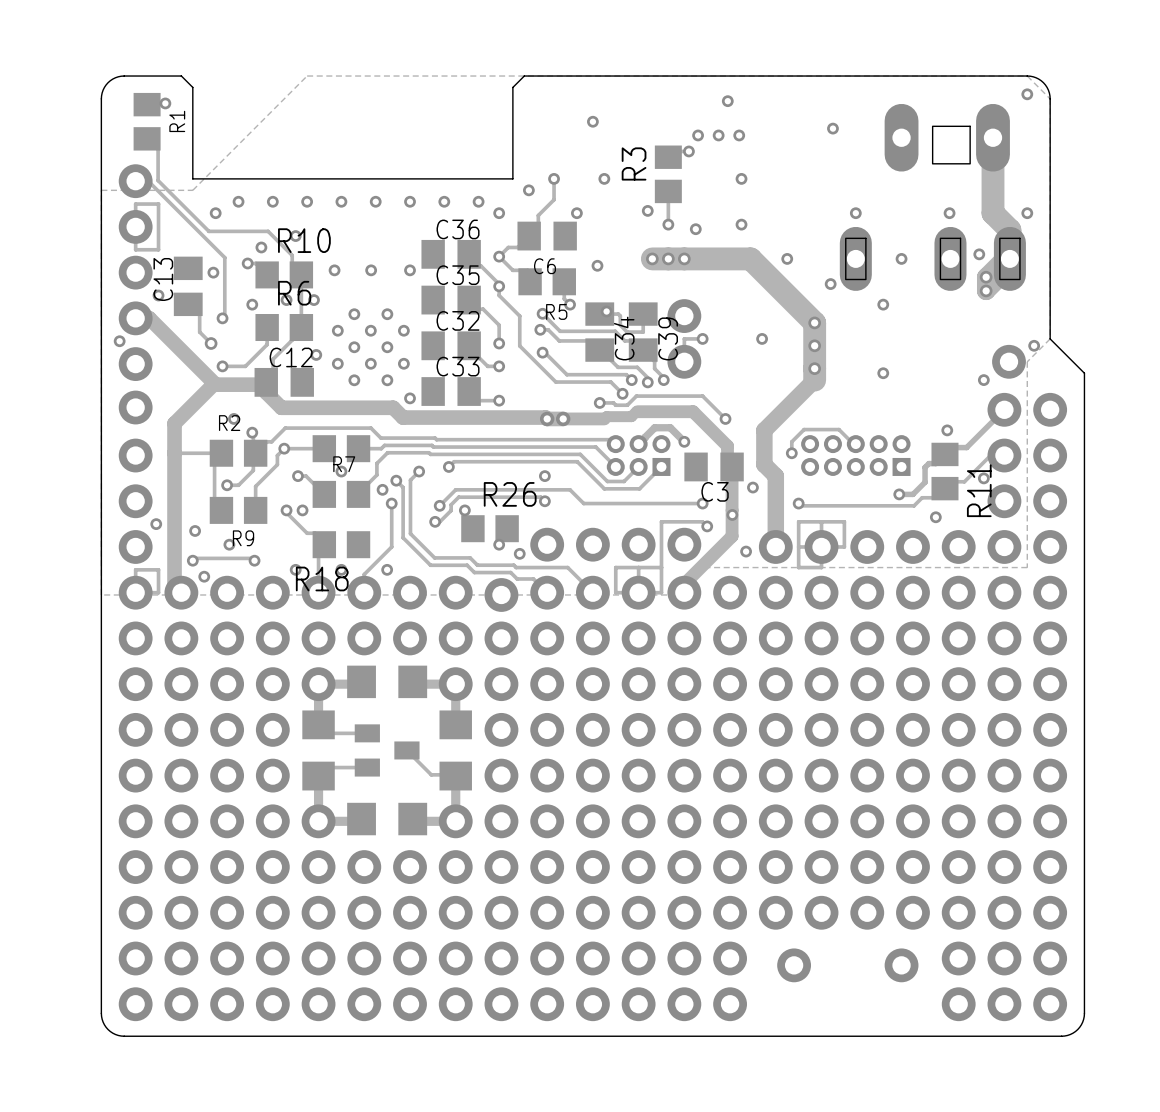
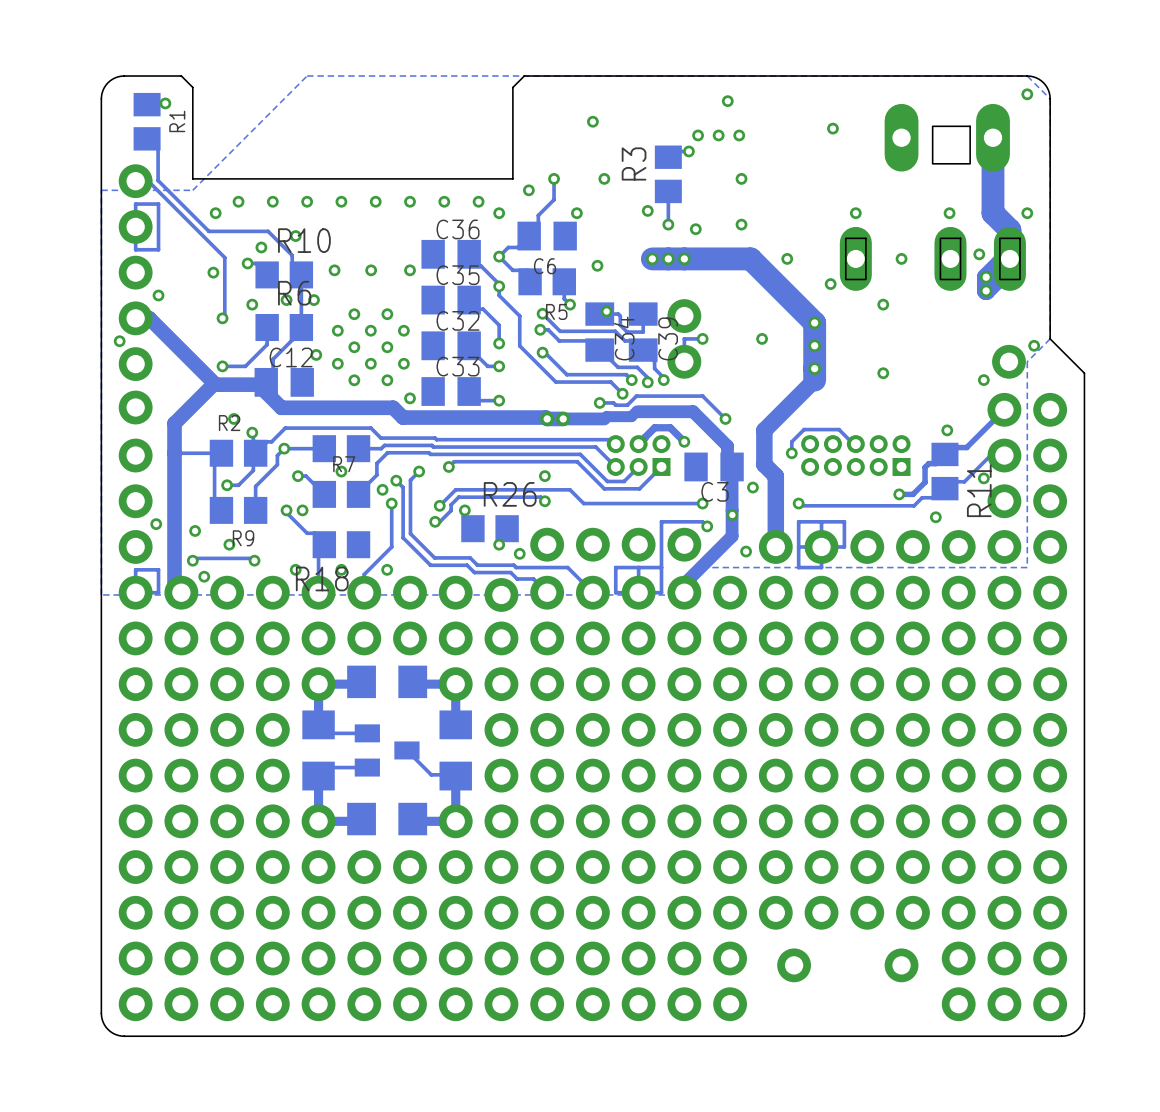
C13: (188, 286) -> none
track: (188, 304) (192, 304) (199, 311) (199, 332) (211, 343) -> none
via: (211, 343) -> none

